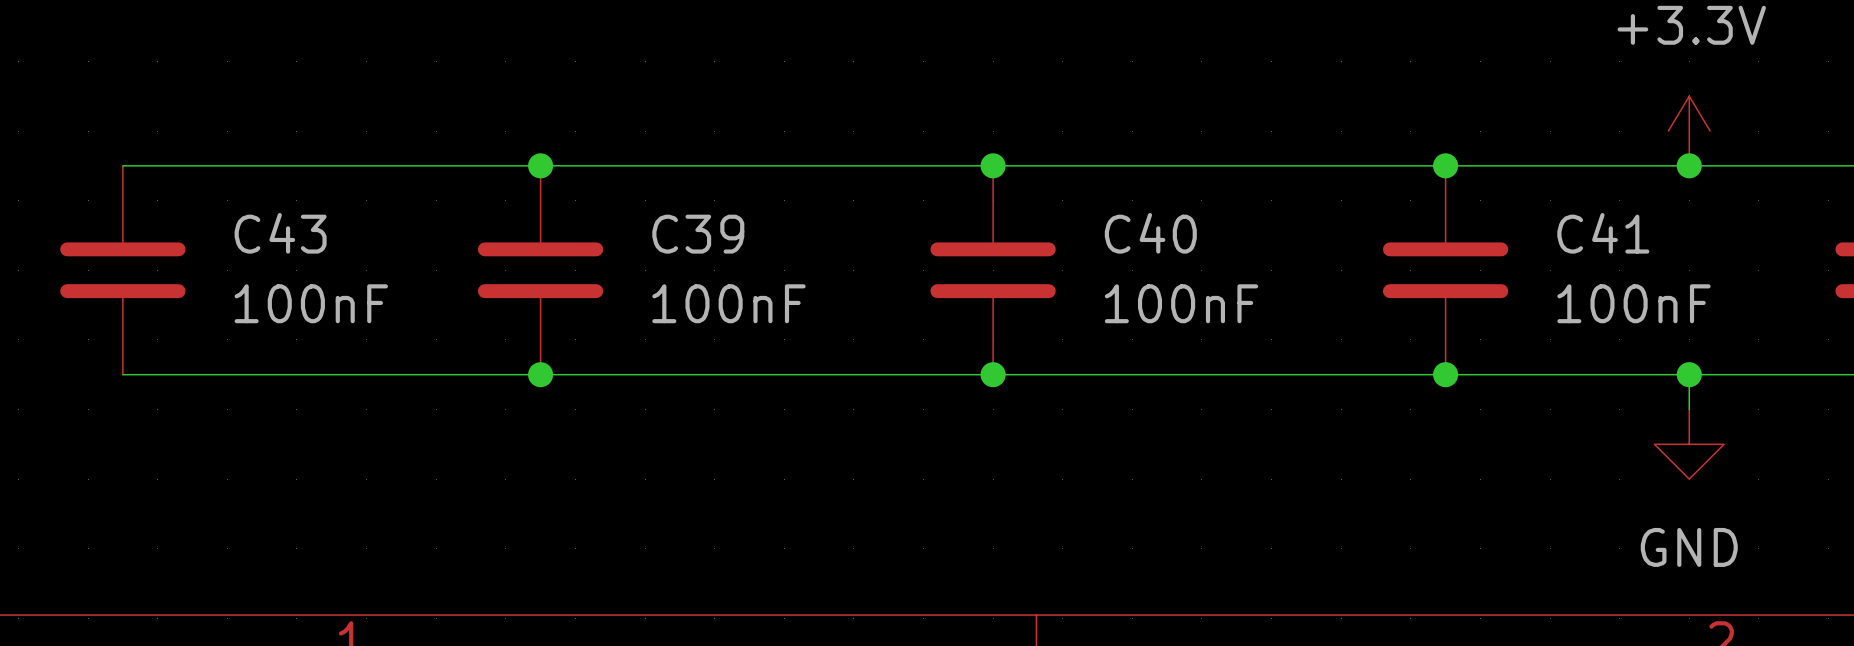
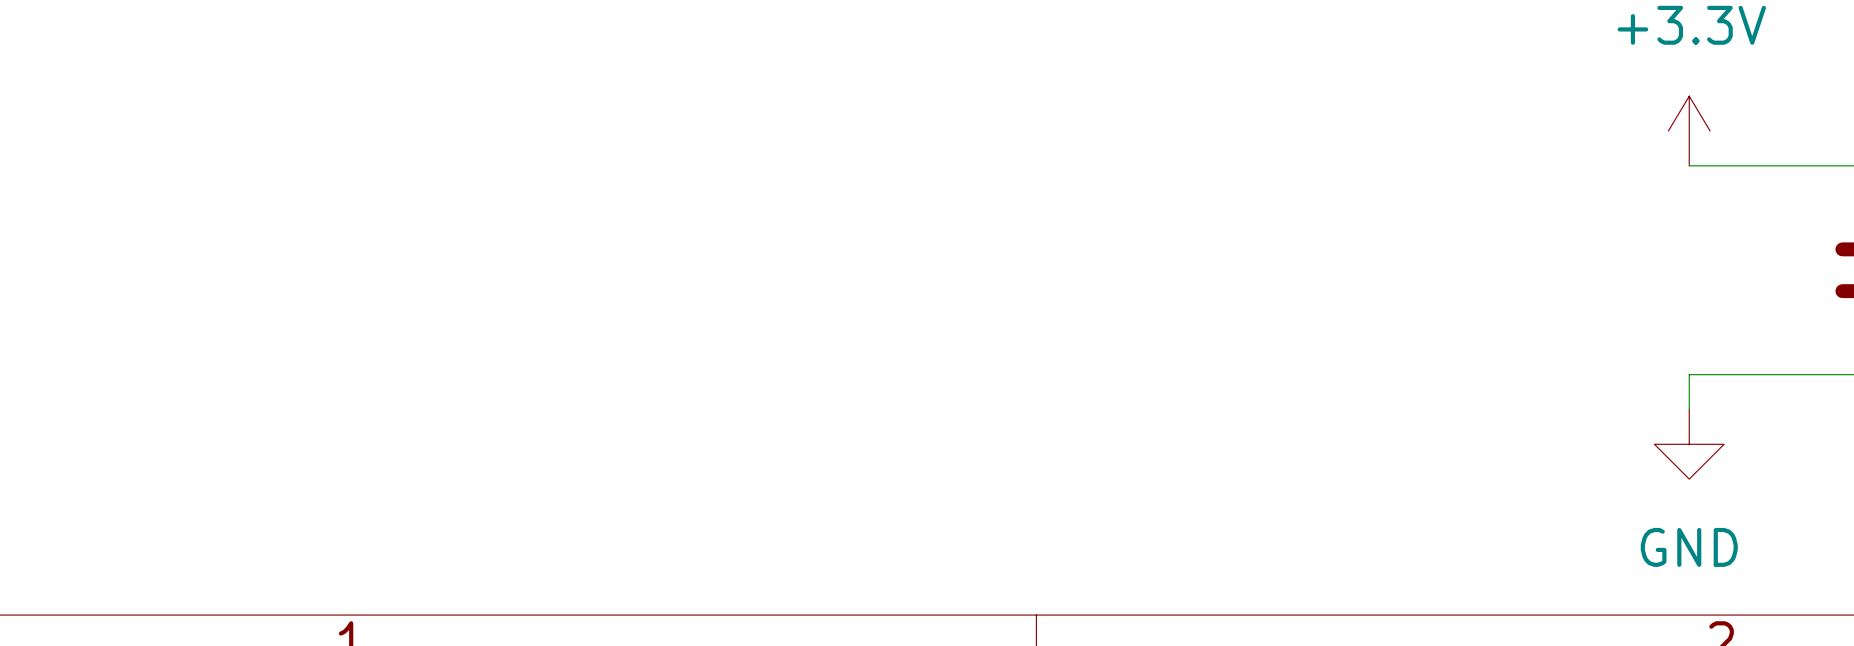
wire: (122, 165) (1689, 165) -> none
junction: (540, 165) -> none
junction: (993, 165) -> none
junction: (1445, 165) -> none
junction: (1689, 165) -> none
C43: 100nF (122, 270) -> none
C39: 100nF (540, 270) -> none
C40: 100nF (993, 270) -> none
C41: 100nF (1445, 270) -> none
wire: (122, 374) (1689, 374) -> none
junction: (540, 374) -> none
junction: (993, 374) -> none
junction: (1445, 374) -> none
junction: (1689, 374) -> none

